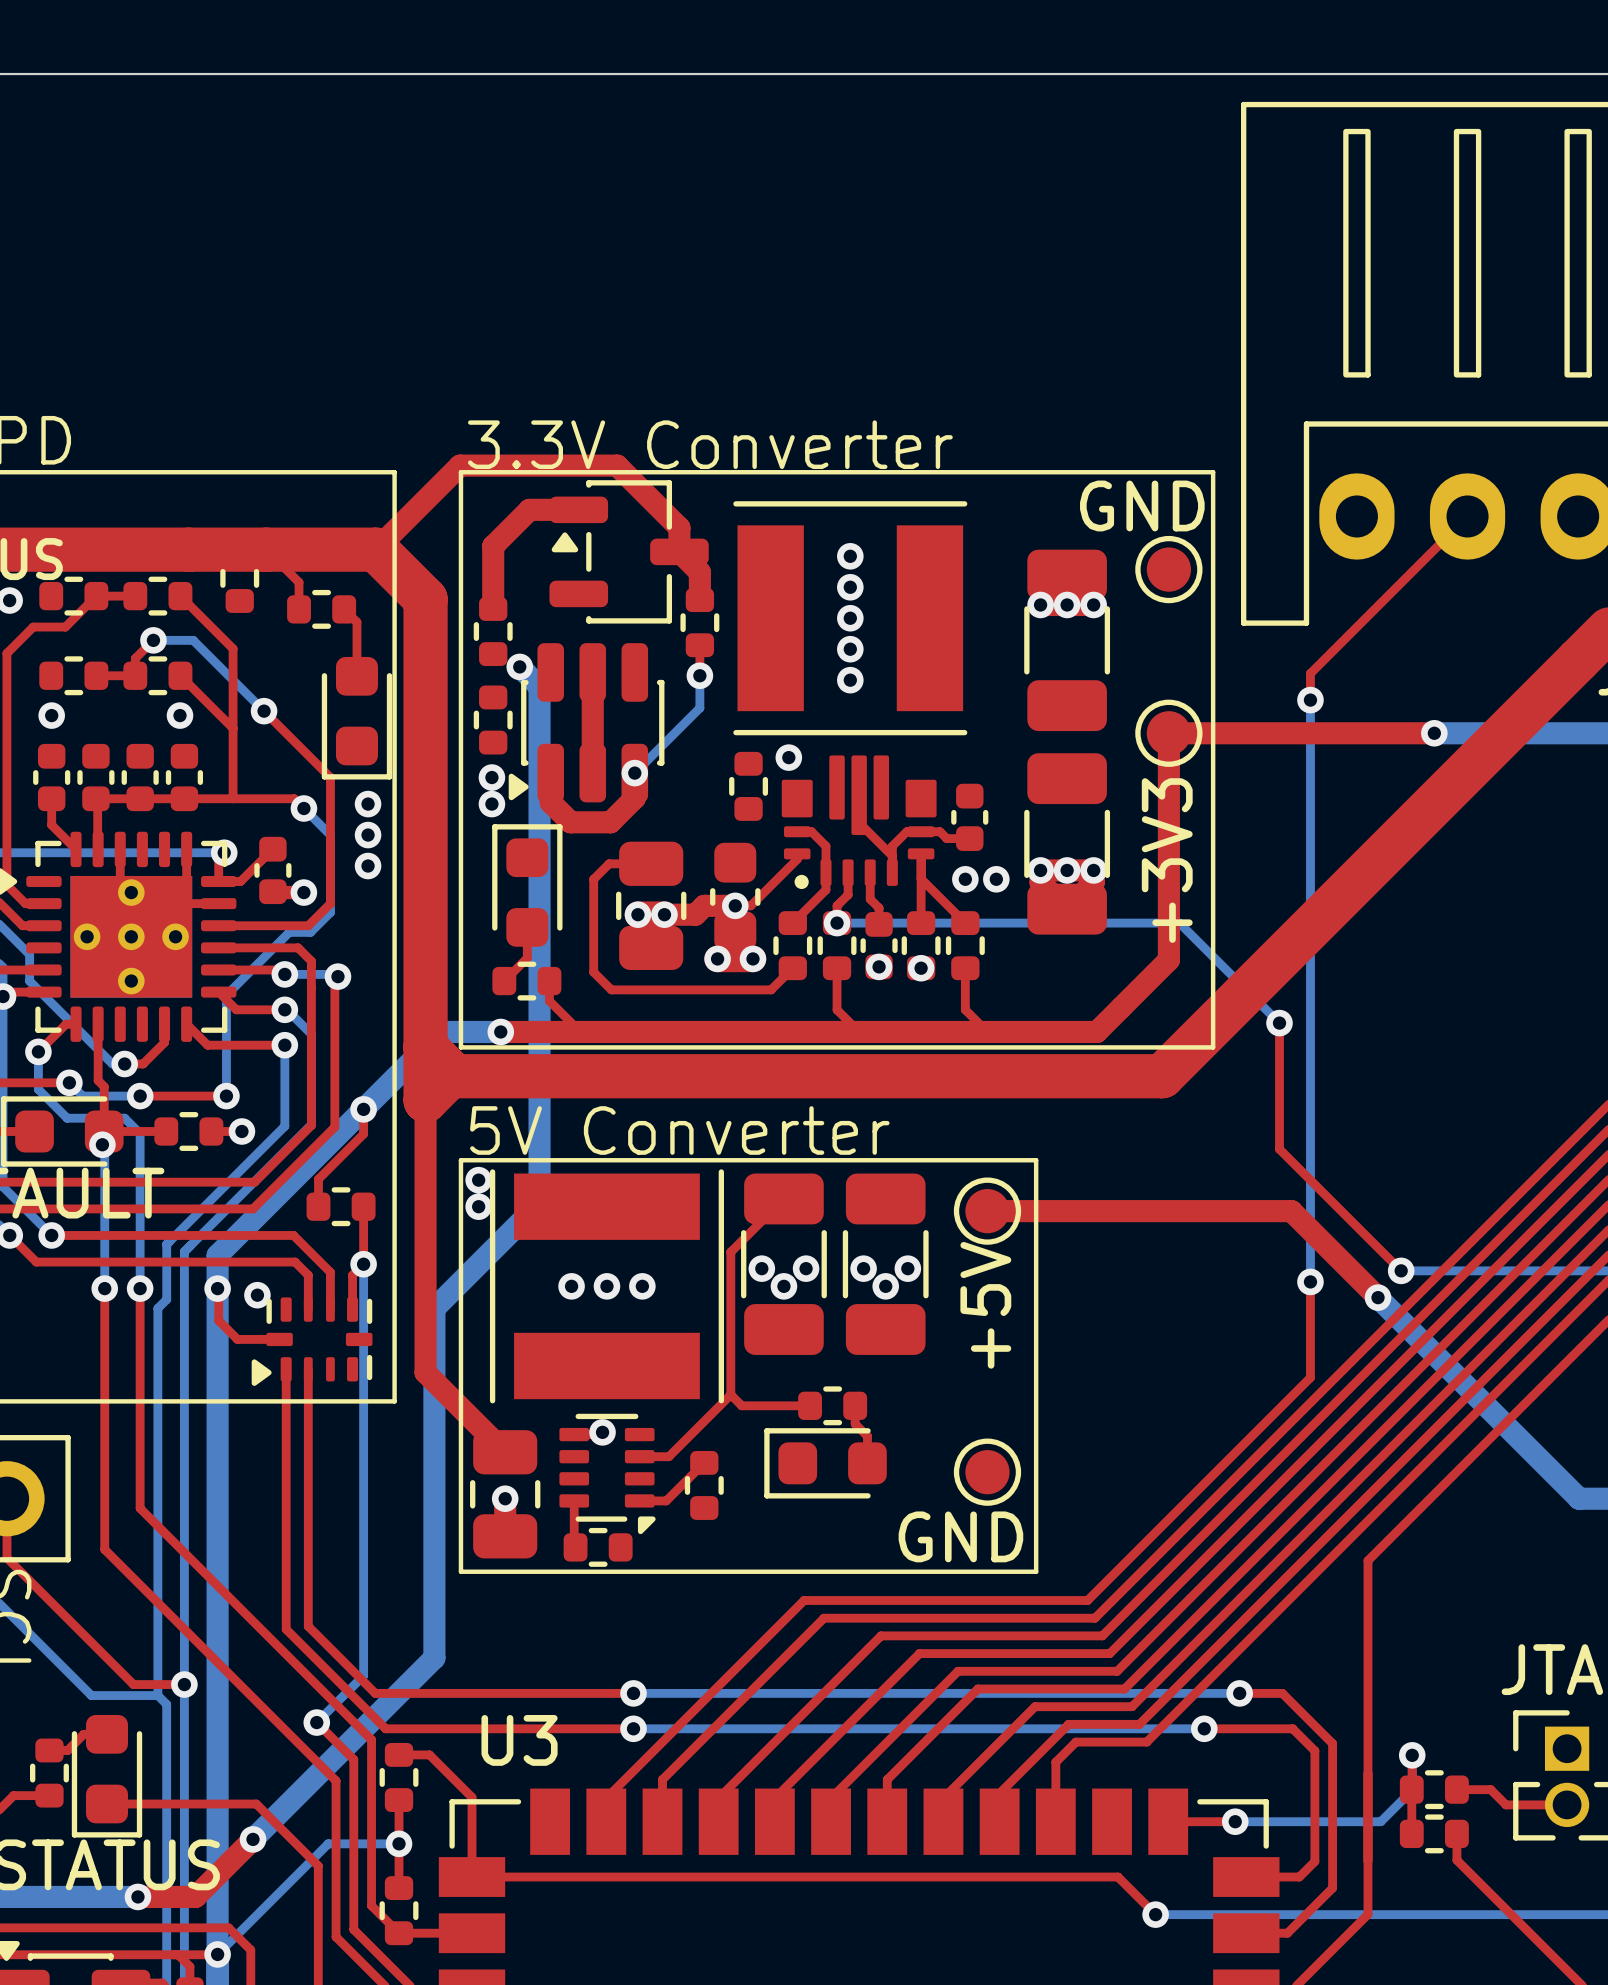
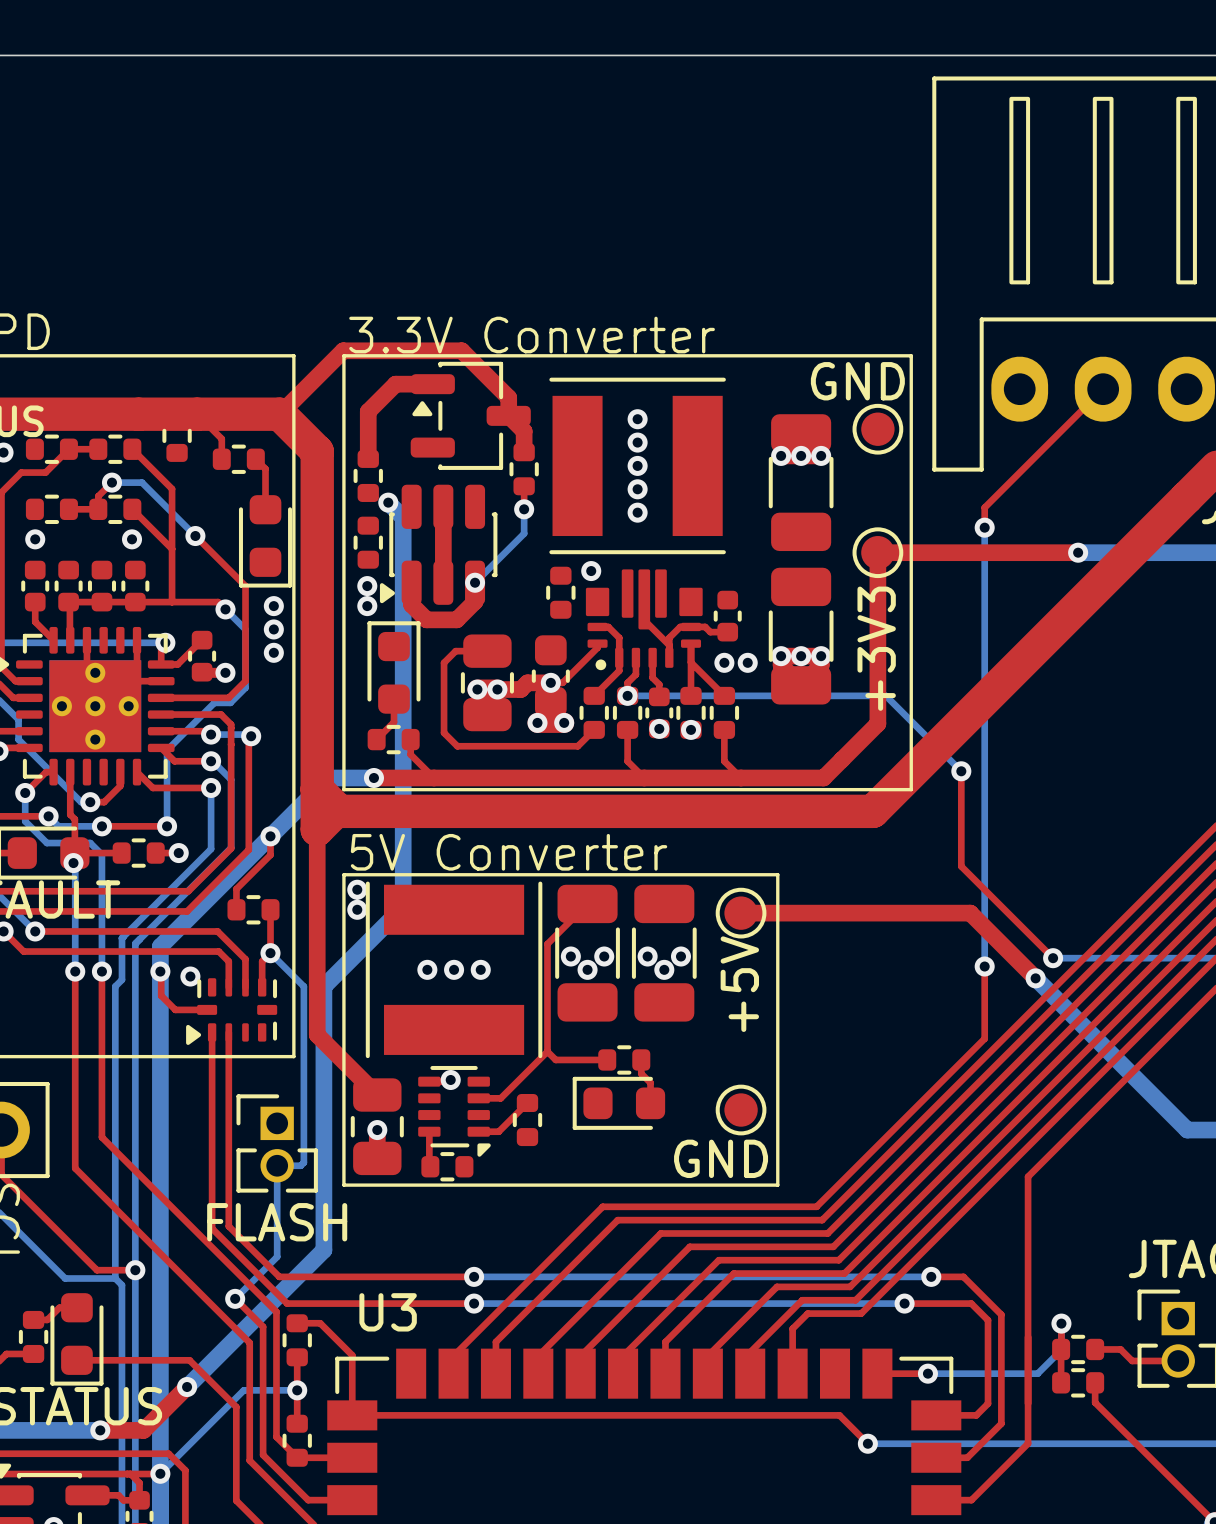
bottom track: (363, 1264) (363, 1675) -> (270, 953) (303, 986) (303, 1162) (300, 1165) (277, 1165) (277, 1256) (270, 1263)
part: none -> FLASH (277, 1143)

